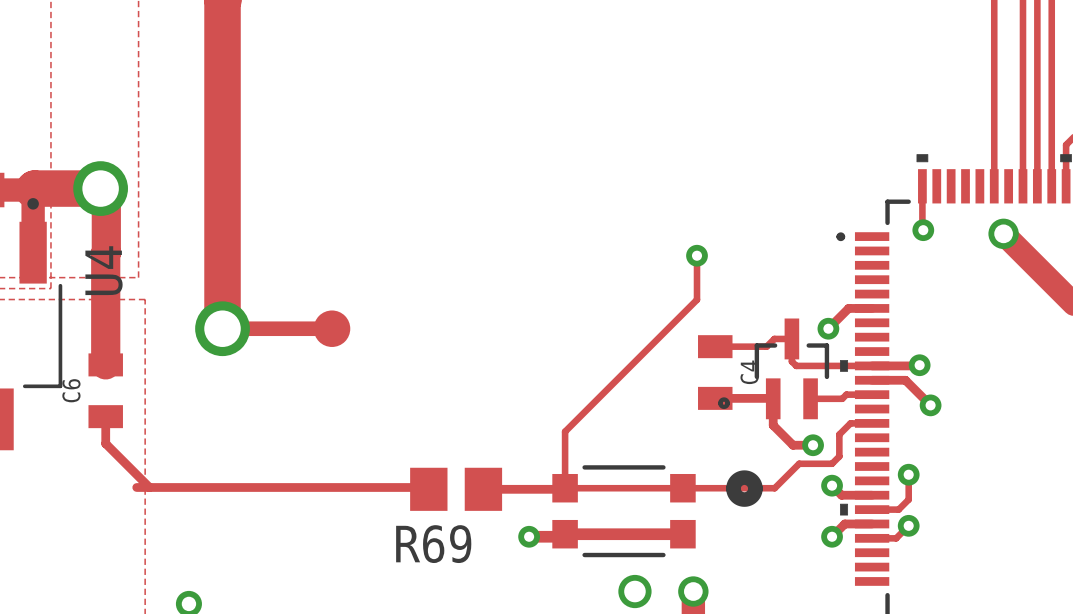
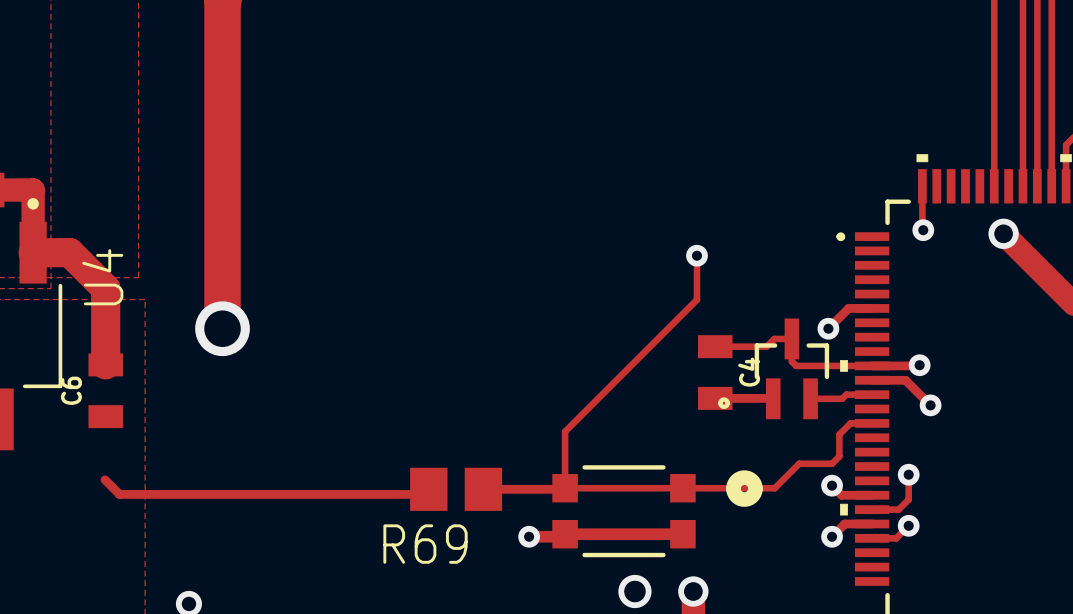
via: (100, 188) -> none
track: (33, 190) (100, 188) (106, 194) (105, 288) -> (33, 252) (69, 252) (105, 288)
track: (222, 328) (332, 328) -> none
part: (332, 328) -> none
track: (773, 398) (773, 425) (793, 445) (813, 445) -> none
track: (105, 416) (105, 443) (149, 487) -> none
via: (813, 445) -> none
track: (136, 487) (426, 487) (428, 489) -> (104, 479) (119, 494) (423, 494) (428, 489)

